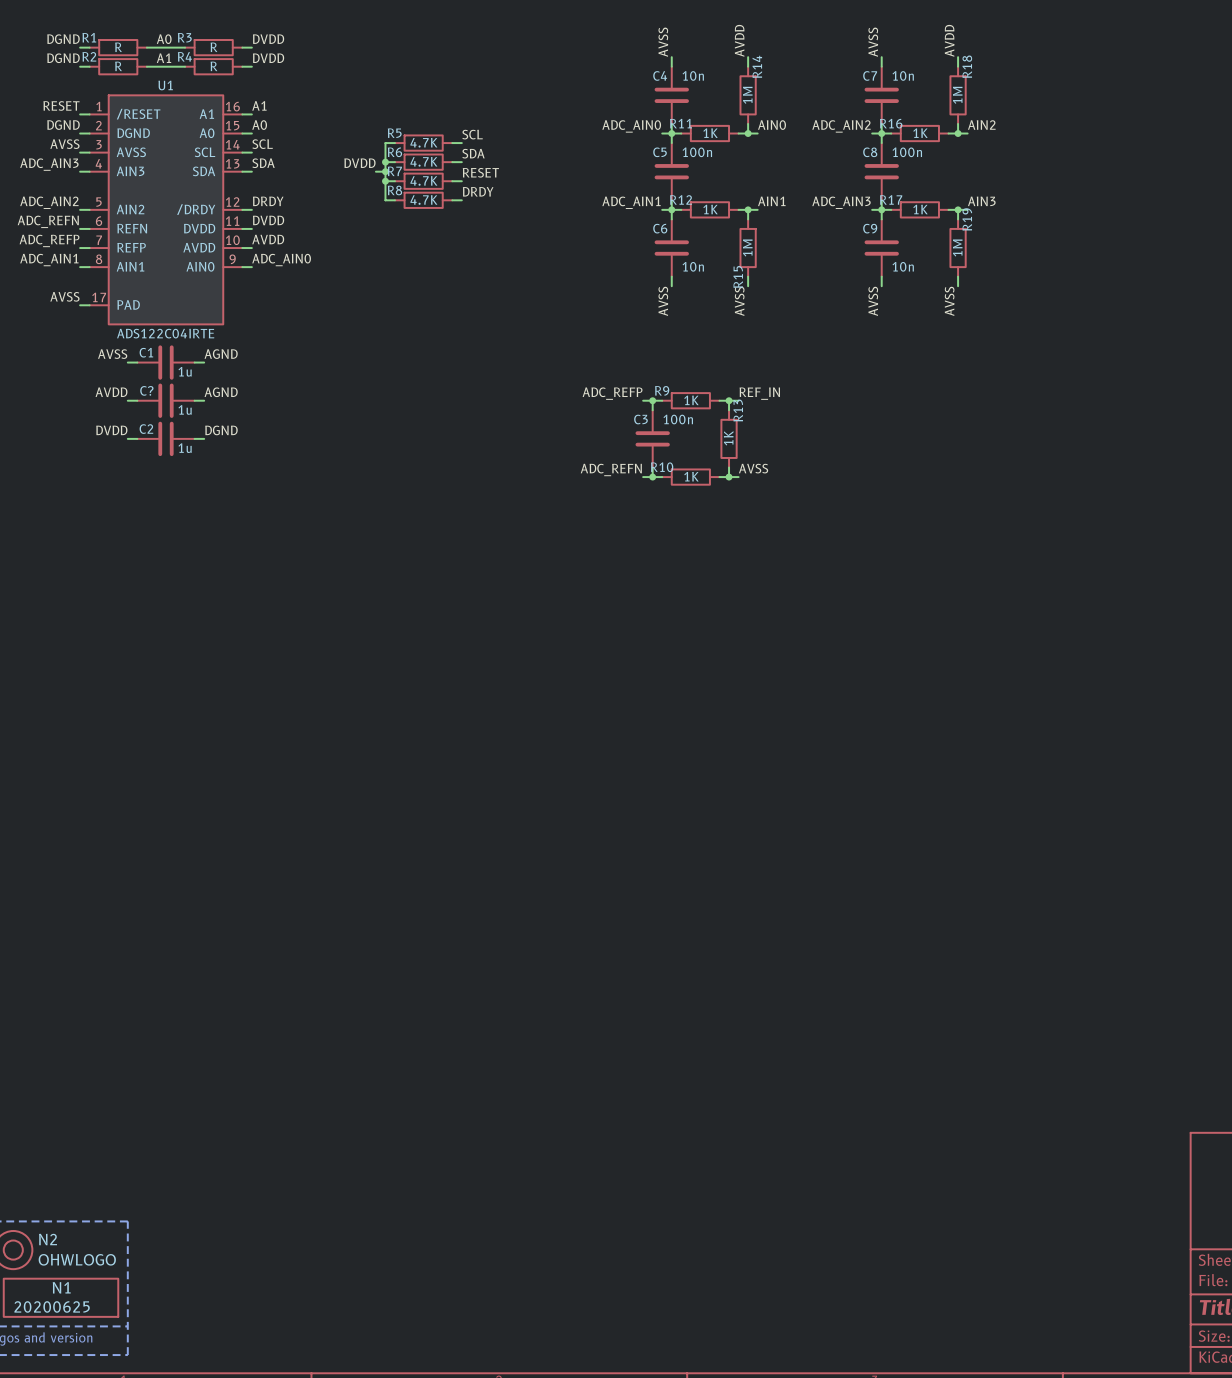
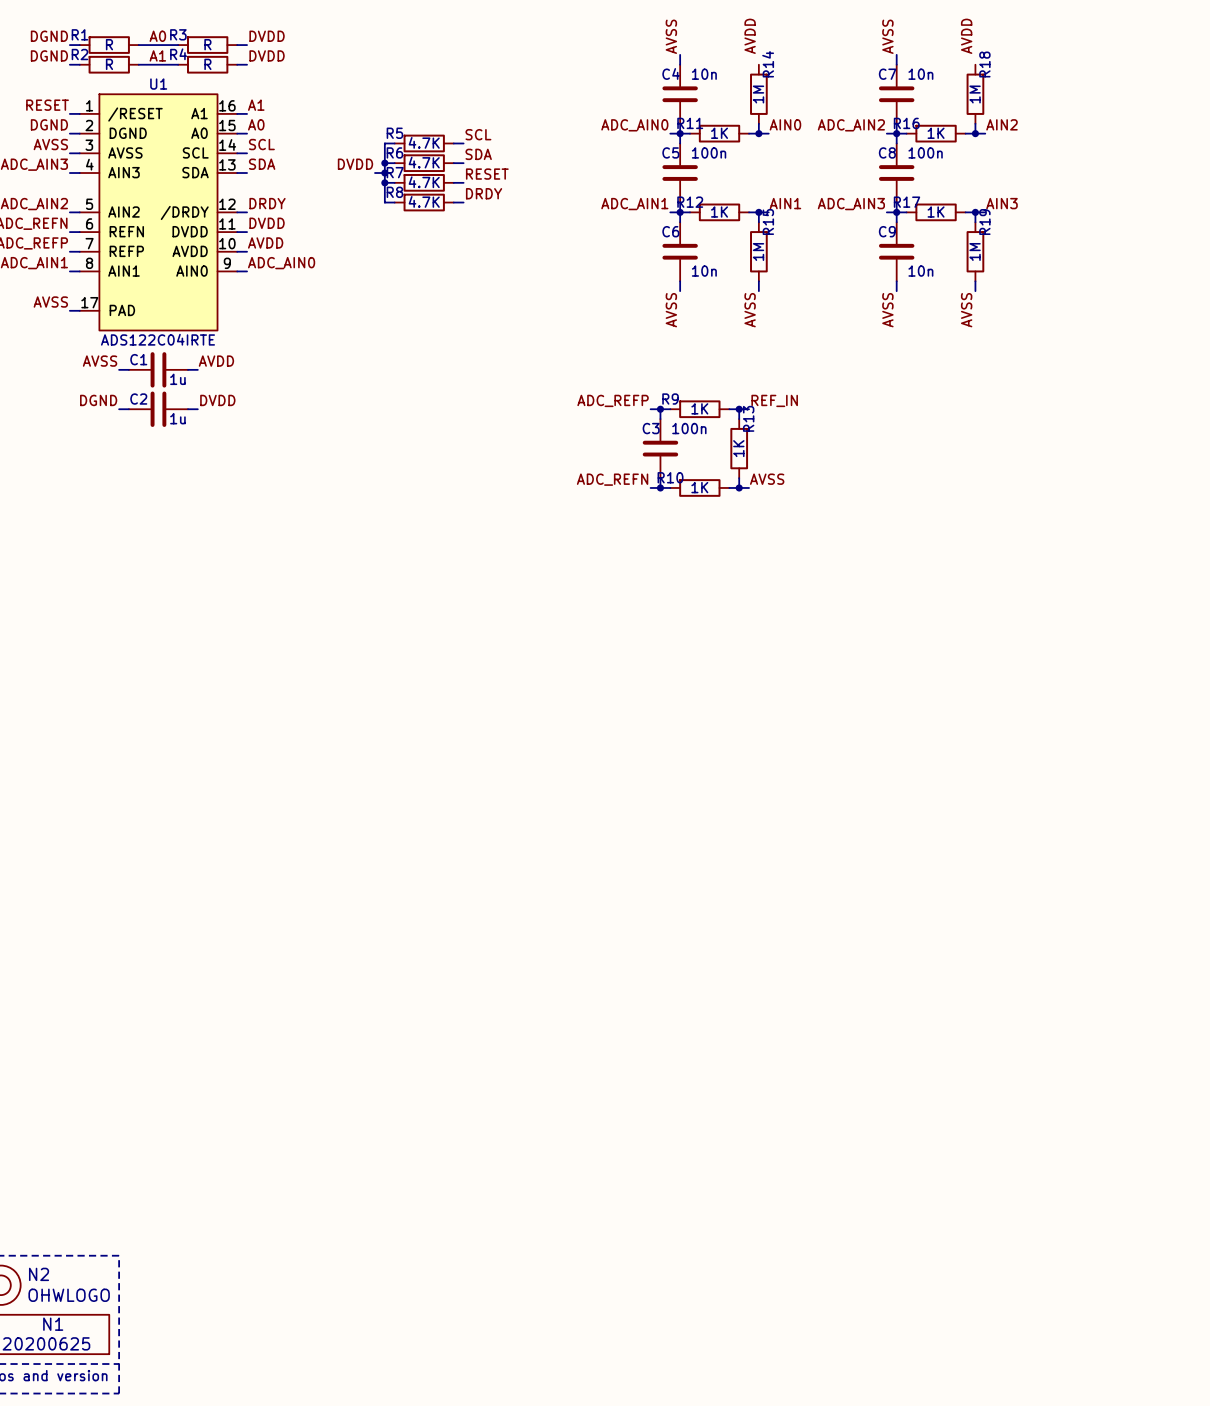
wire: (748, 57) (748, 66) -> none
wire: (958, 57) (958, 66) -> none
R15 name position: R15 (738, 276) -> R15 (768, 221)
label: AGND (221, 354) -> AVDD (216, 361)
C? name: C? (146, 390) -> C2 (138, 399)
label: AVDD (111, 392) -> DGND (98, 400)
label: AGND (221, 392) -> DVDD (217, 400)
label: DVDD (111, 430) -> none
label: DGND (221, 430) -> none
wire: (127, 438) (137, 438) -> none
C2: 1u (165, 438) -> none
wire: (194, 438) (204, 438) -> none

